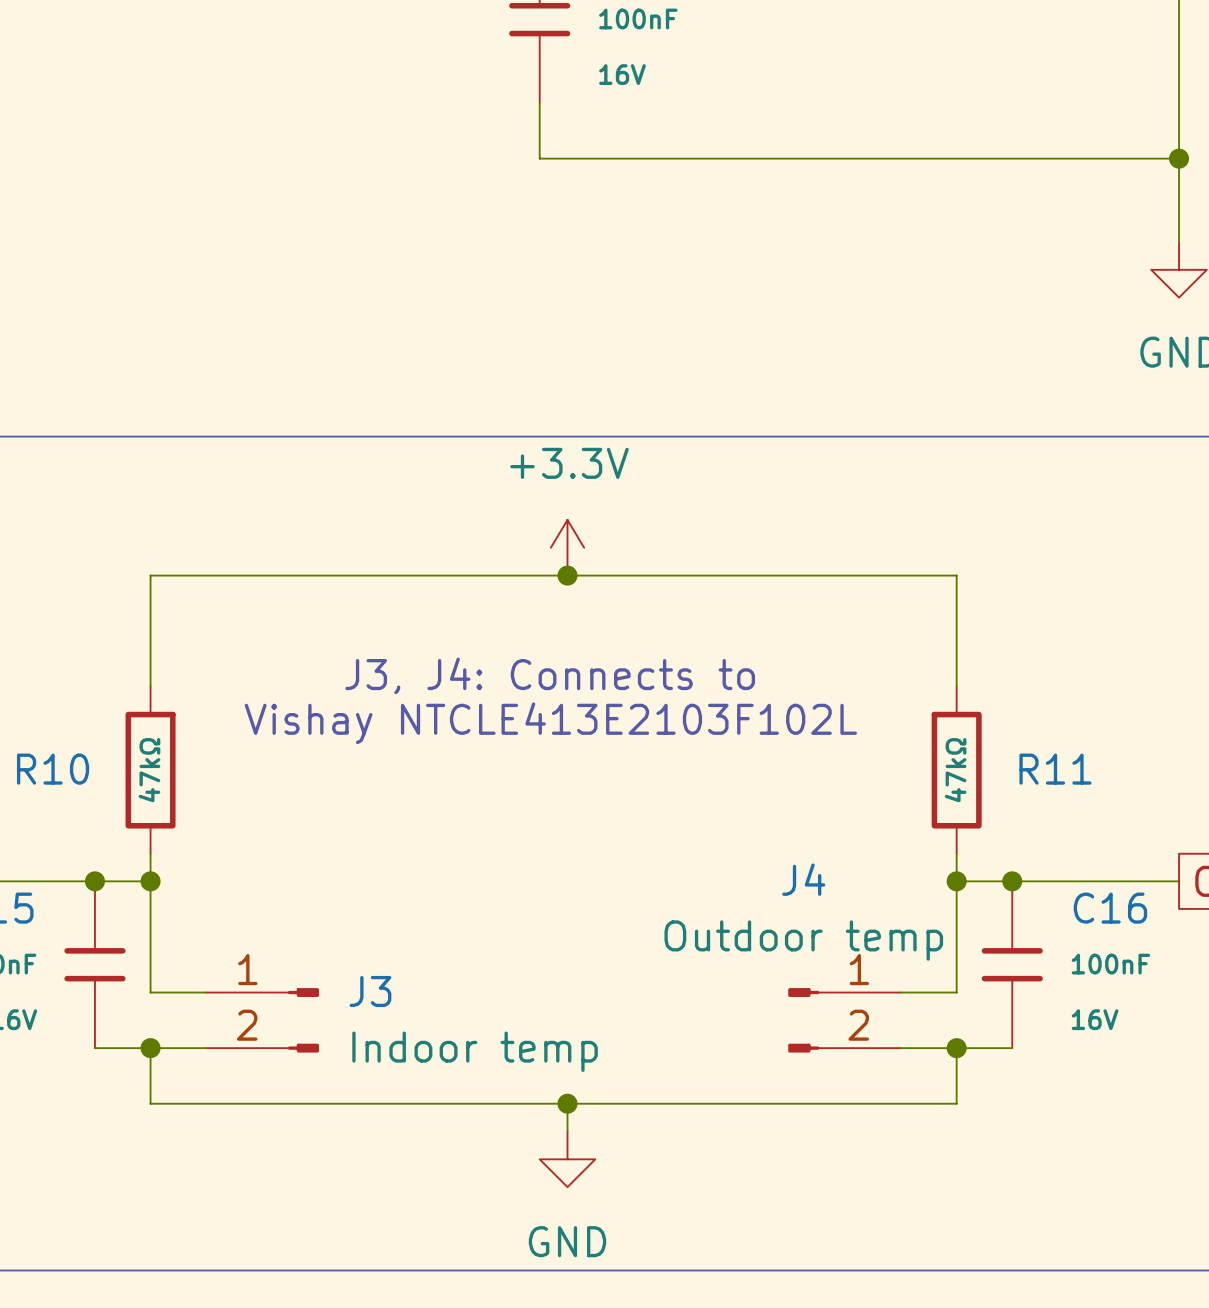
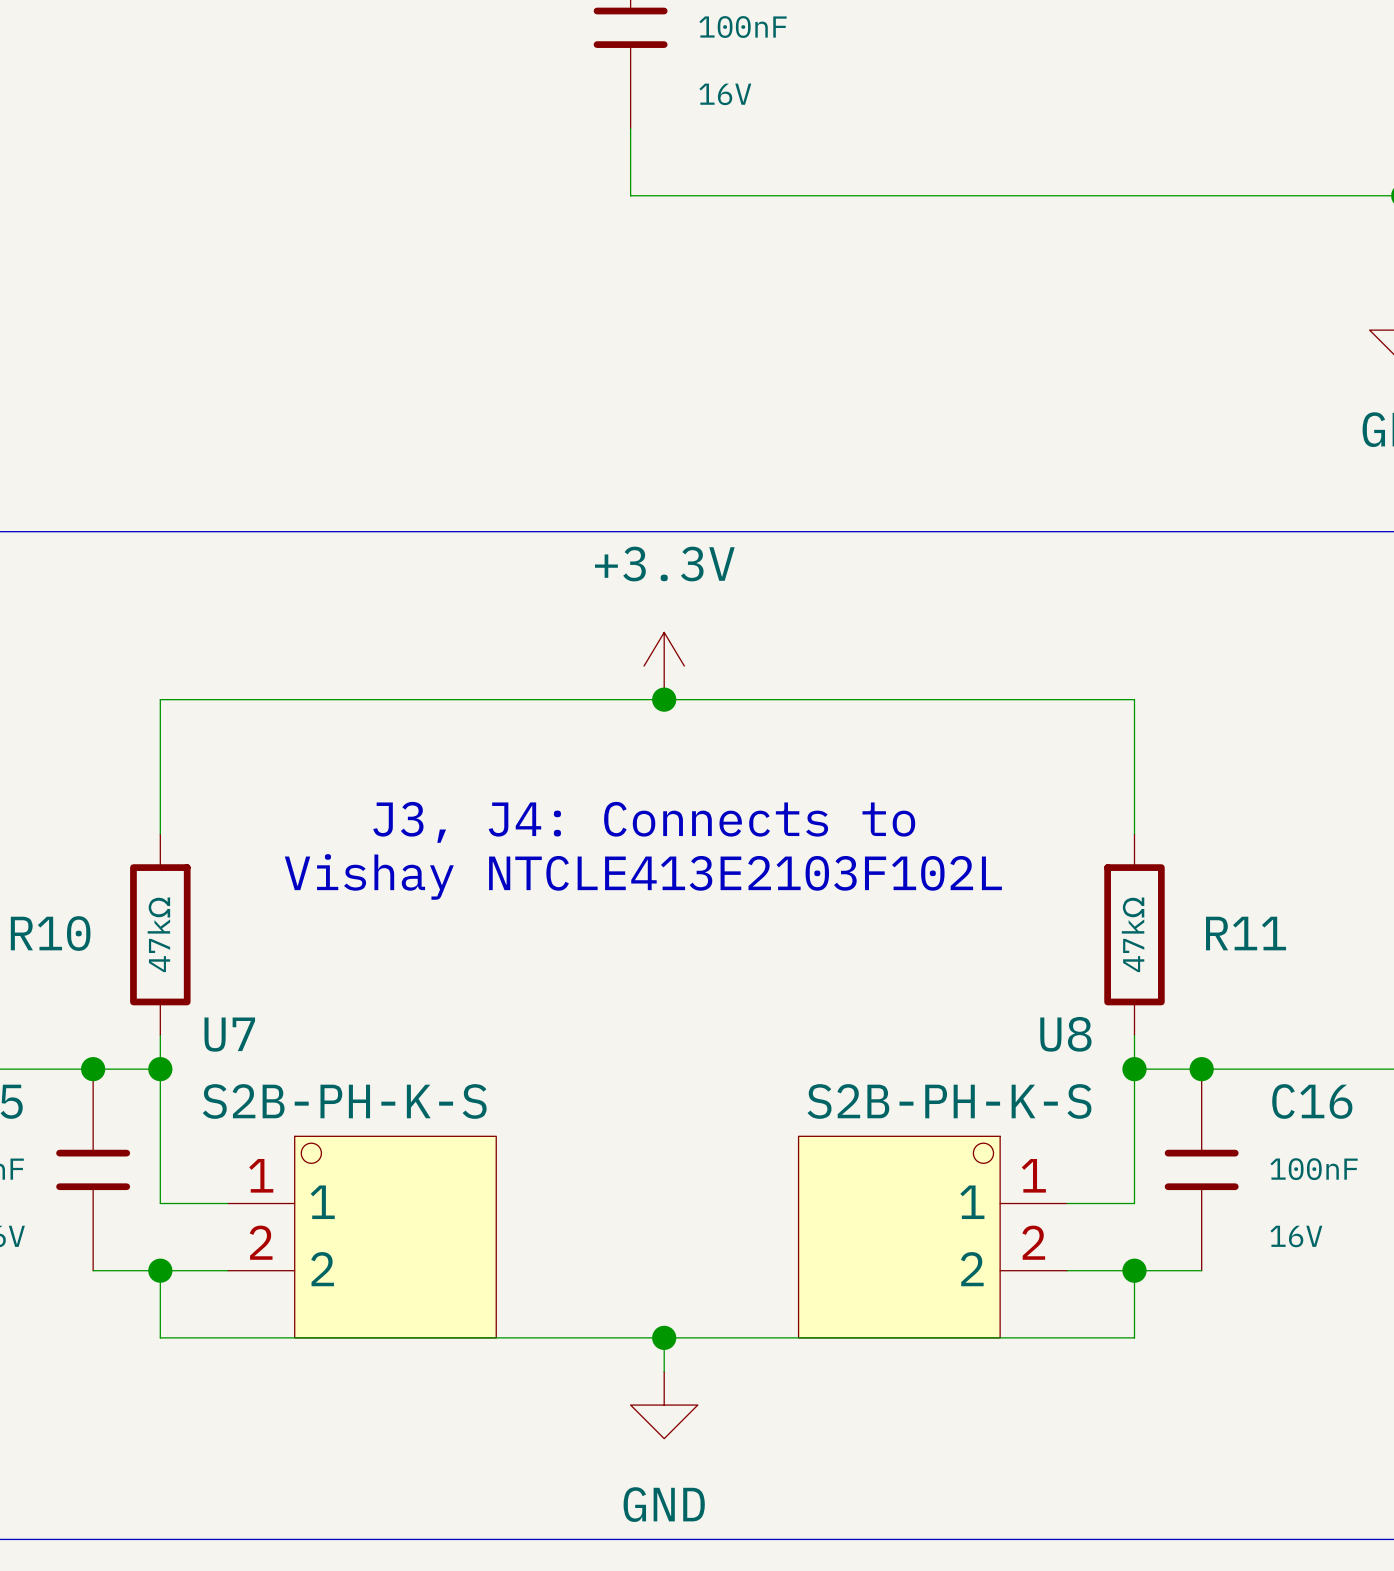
J3: Indoor temp (262, 1020) -> none
U7: none -> S2B-PH-K-S (361, 1237)
U8: none -> S2B-PH-K-S (932, 1237)
J4: Outdoor temp (844, 1020) -> none

